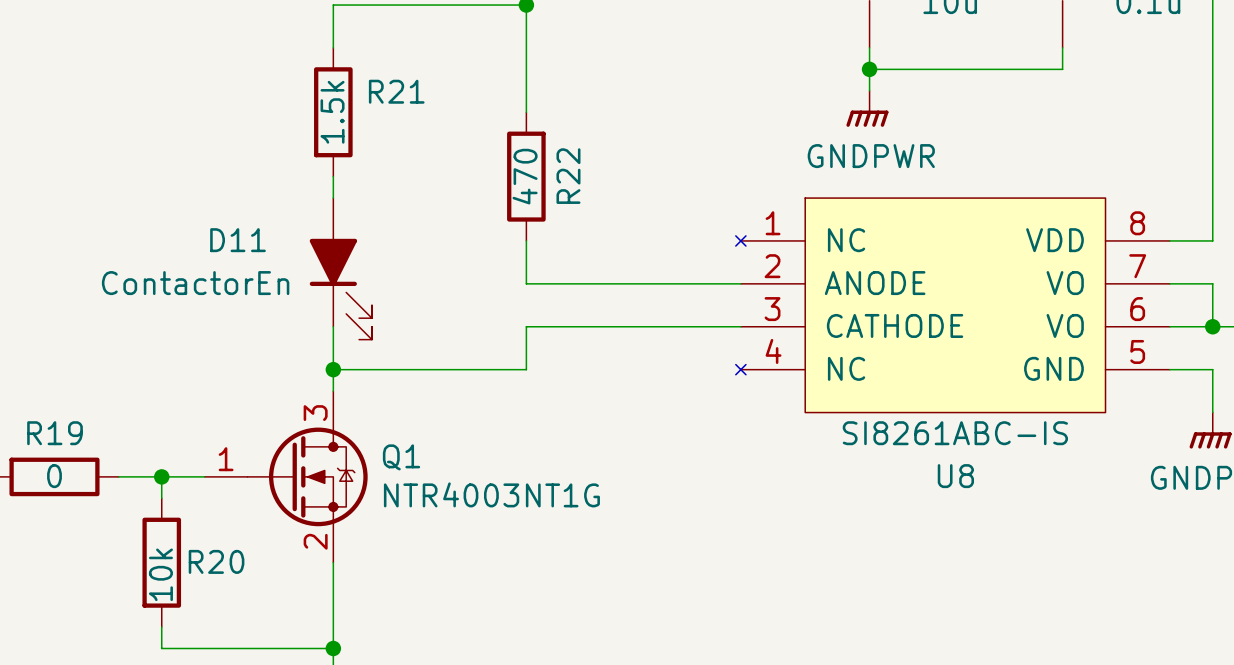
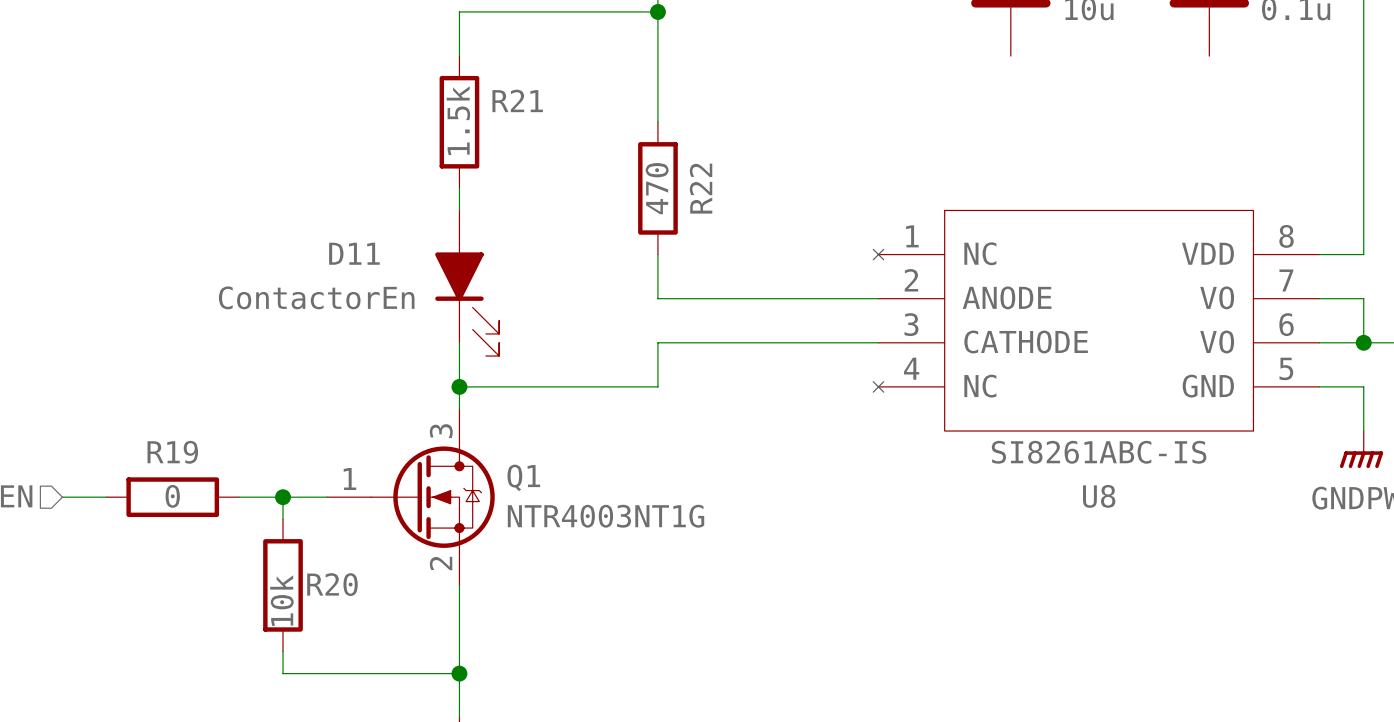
wire: (869, 47) (869, 90) -> none
wire: (1062, 47) (1062, 69) (869, 69) -> none
junction: (869, 69) -> none
power symbol: GNDPWR (867, 108) -> none

